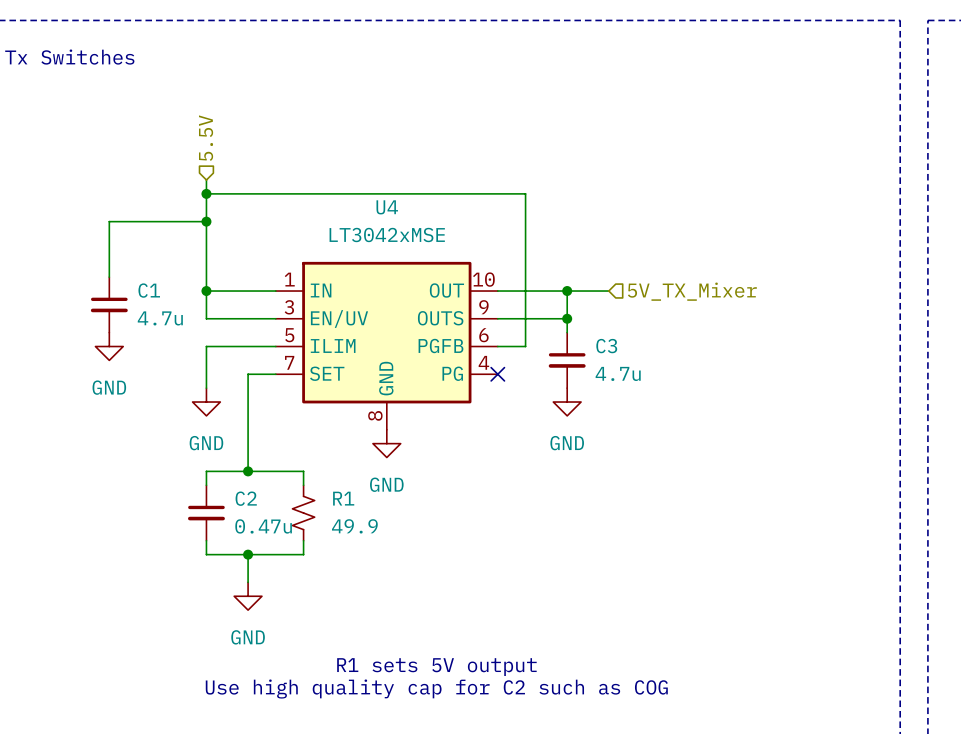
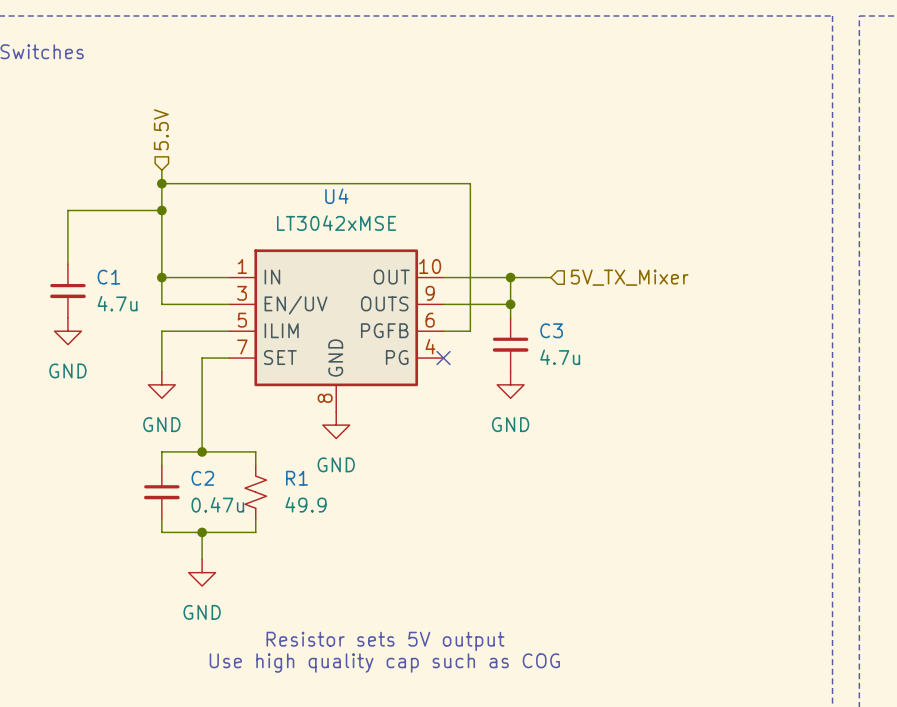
text: R1 sets 5V output (436, 667) -> Resistor sets 5V output (385, 641)
text: Use high quality cap for C2 such as COG (436, 689) -> Use high quality cap such as COG (384, 663)

